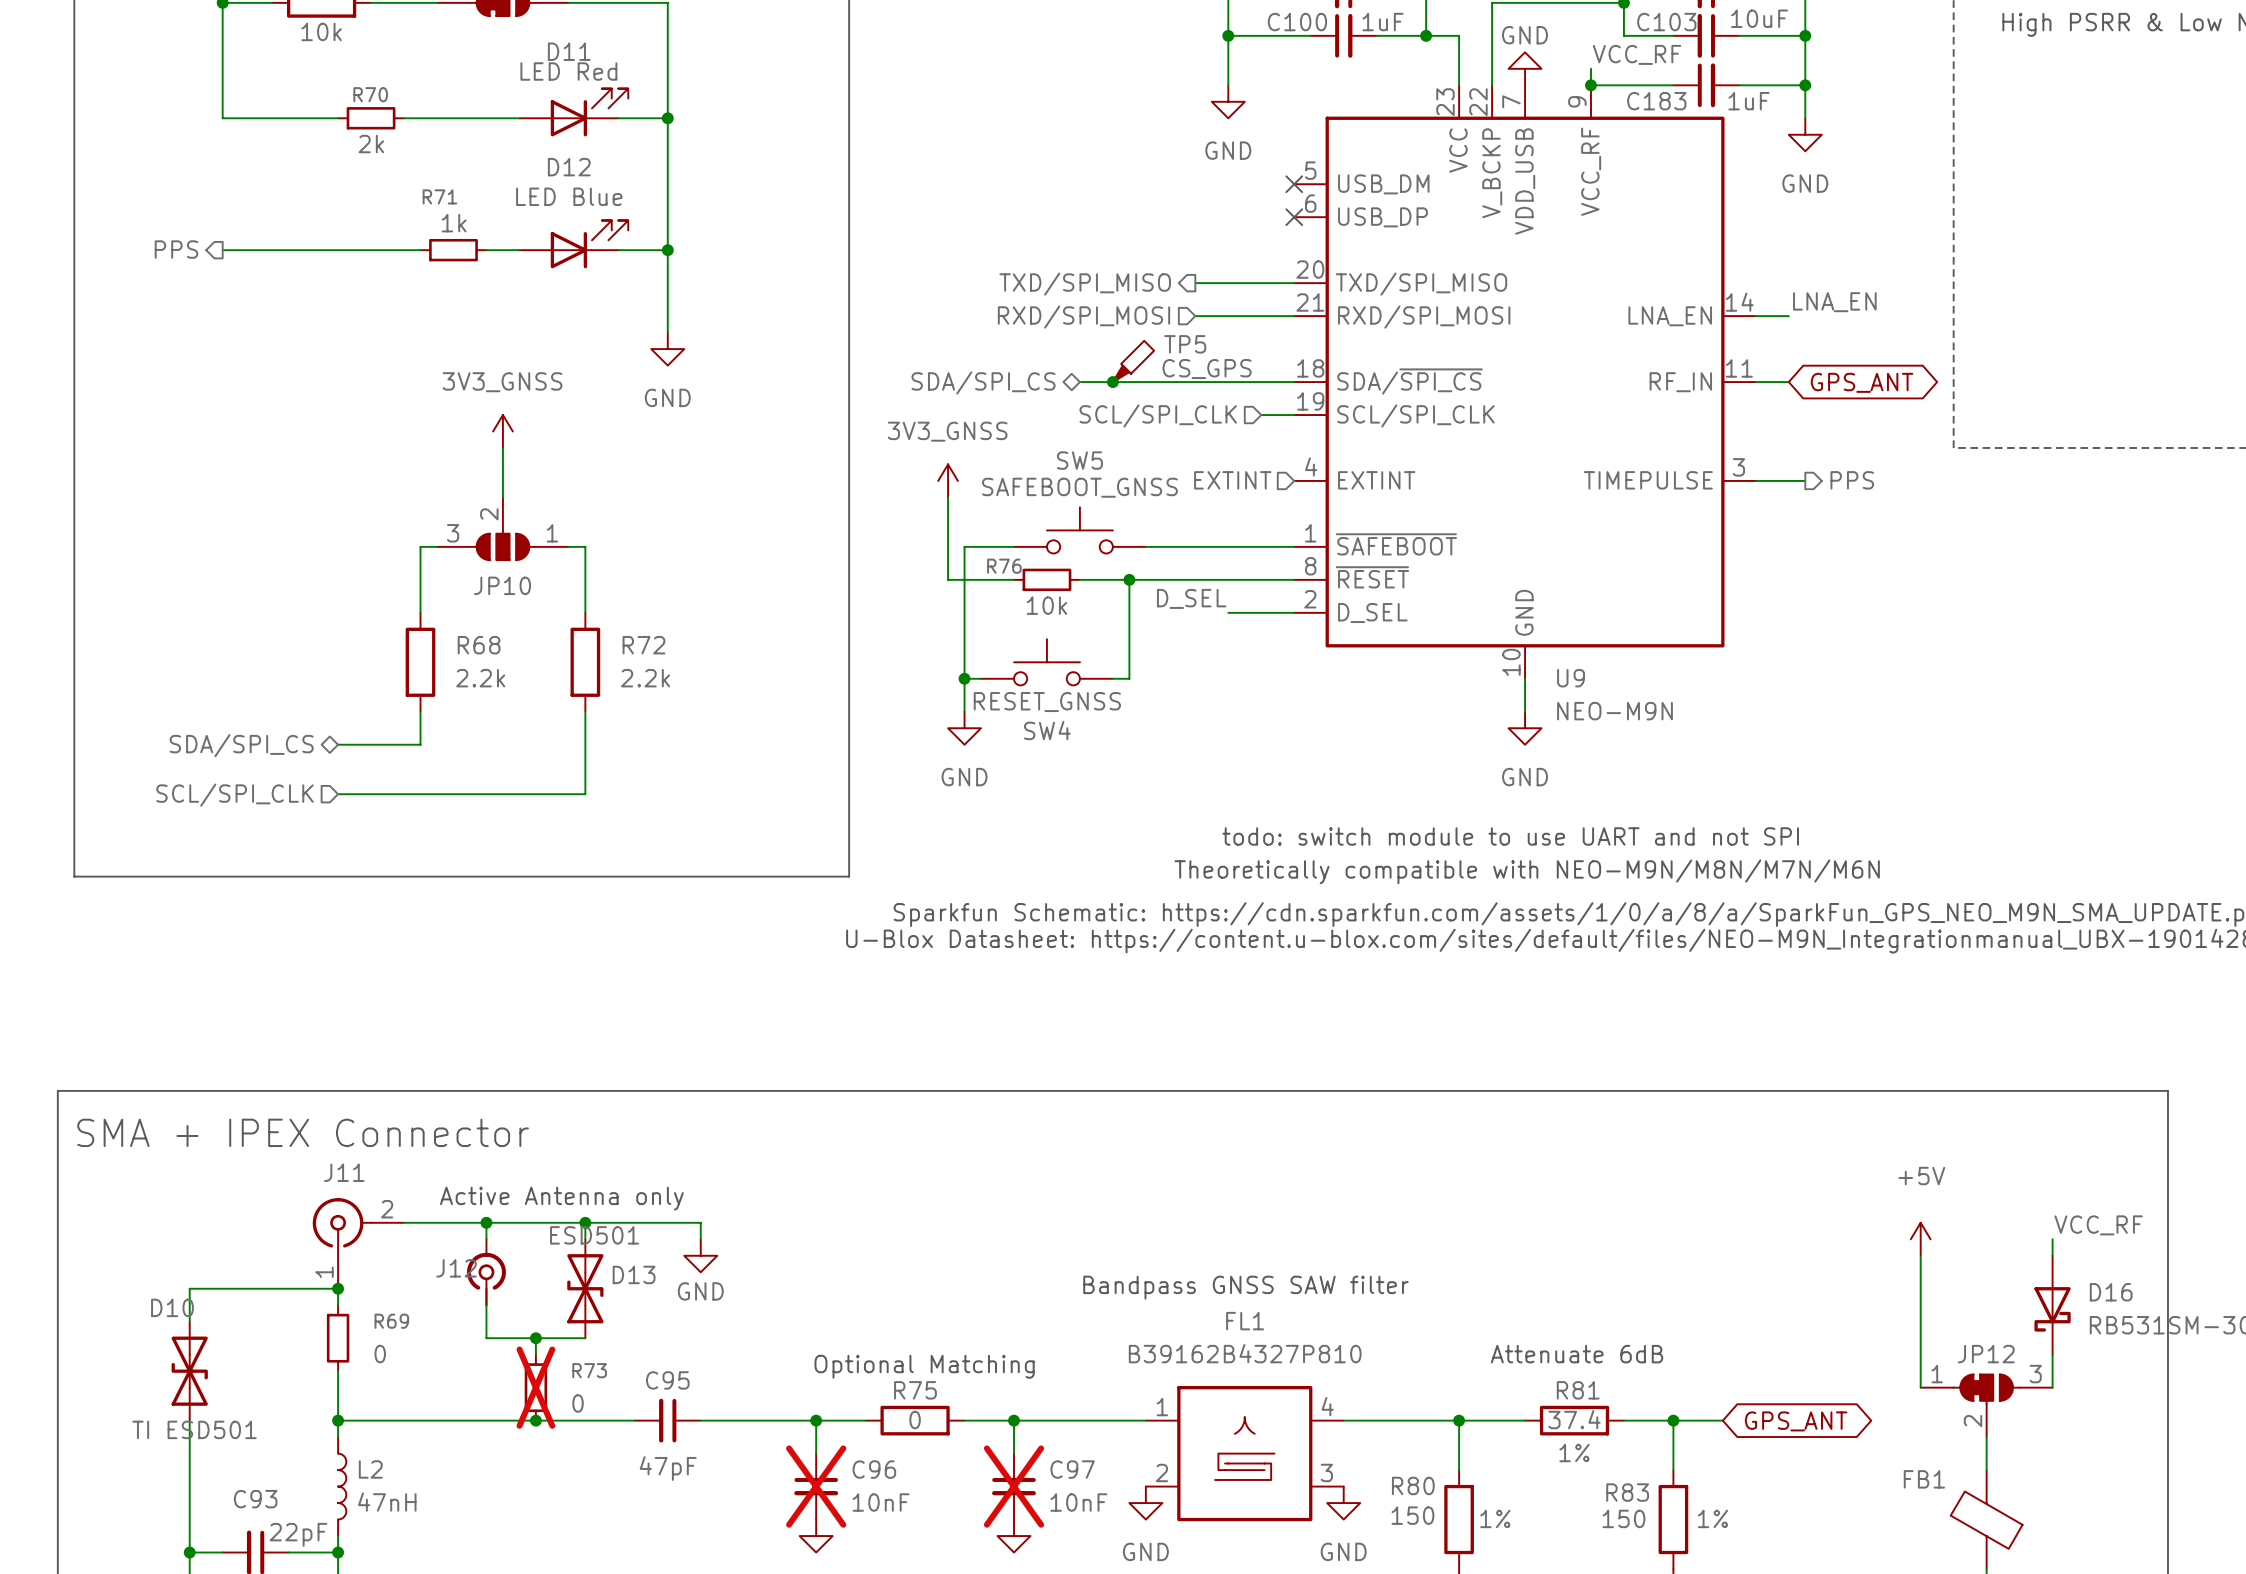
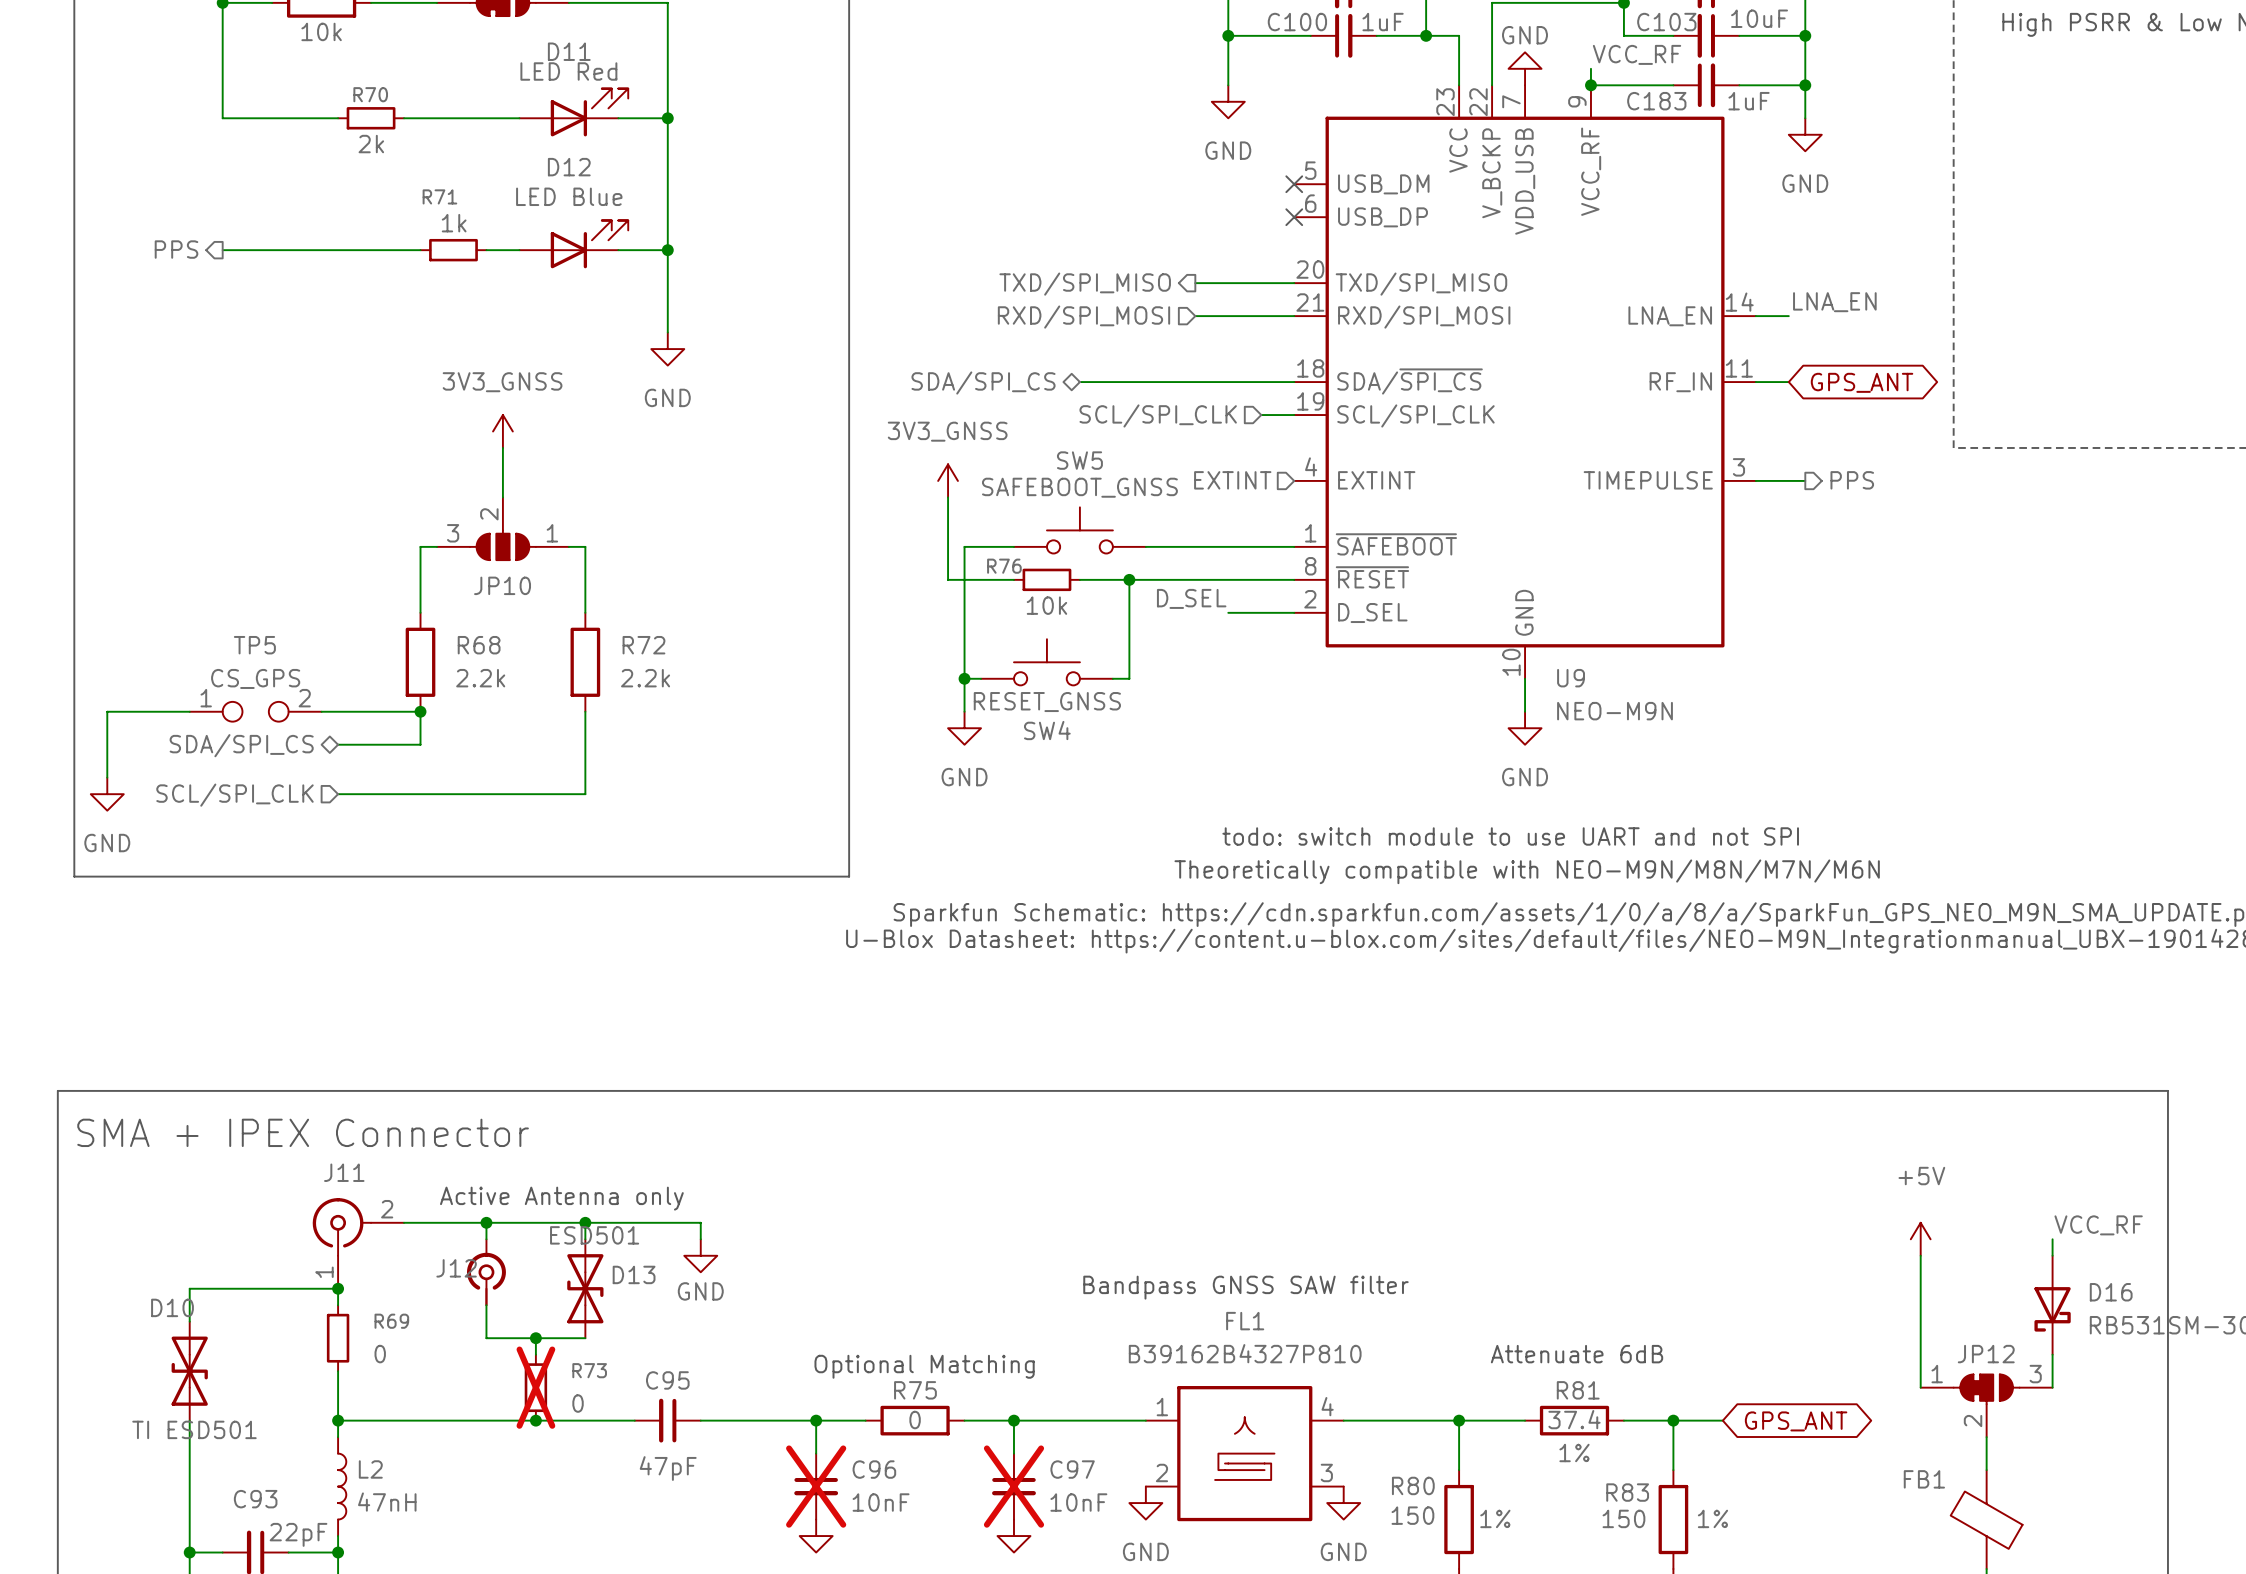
TP5 symbol: [1112, 340, 1155, 383] -> [189, 701, 322, 722]
TP5 name position: TP5 (1185, 344) -> TP5 (254, 645)
TP5 value position: CS_GPS (1207, 369) -> CS_GPS (255, 678)
junction: (1112, 382) -> none
wire: none -> (189, 711) (107, 711) (107, 777)
wire: none -> (321, 711) (420, 711)
junction: none -> (420, 711)
power symbol: none -> GND (107, 794)

